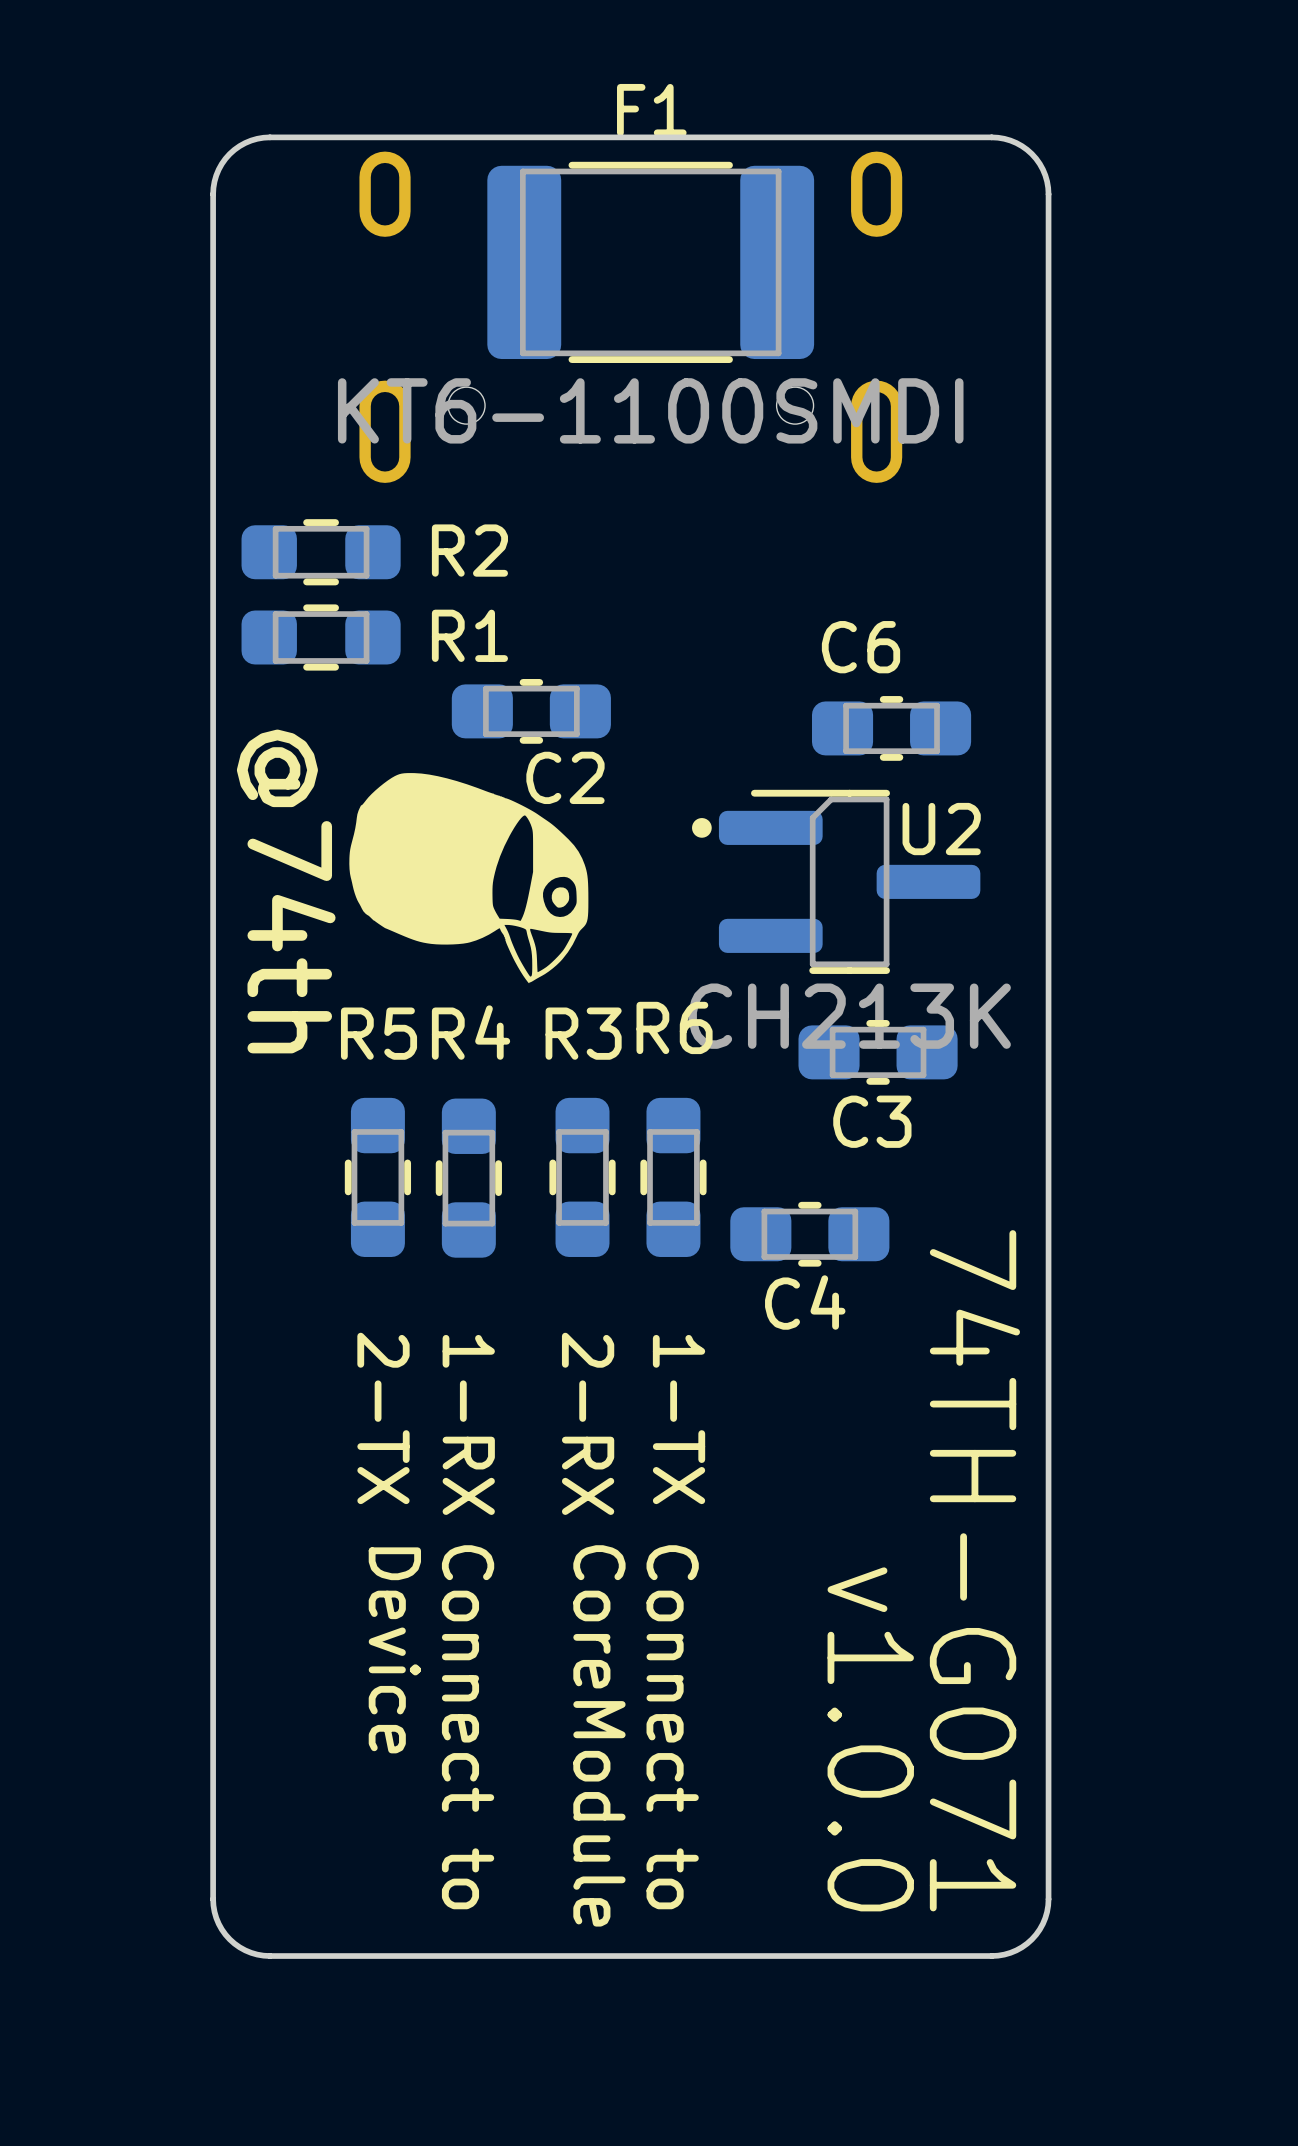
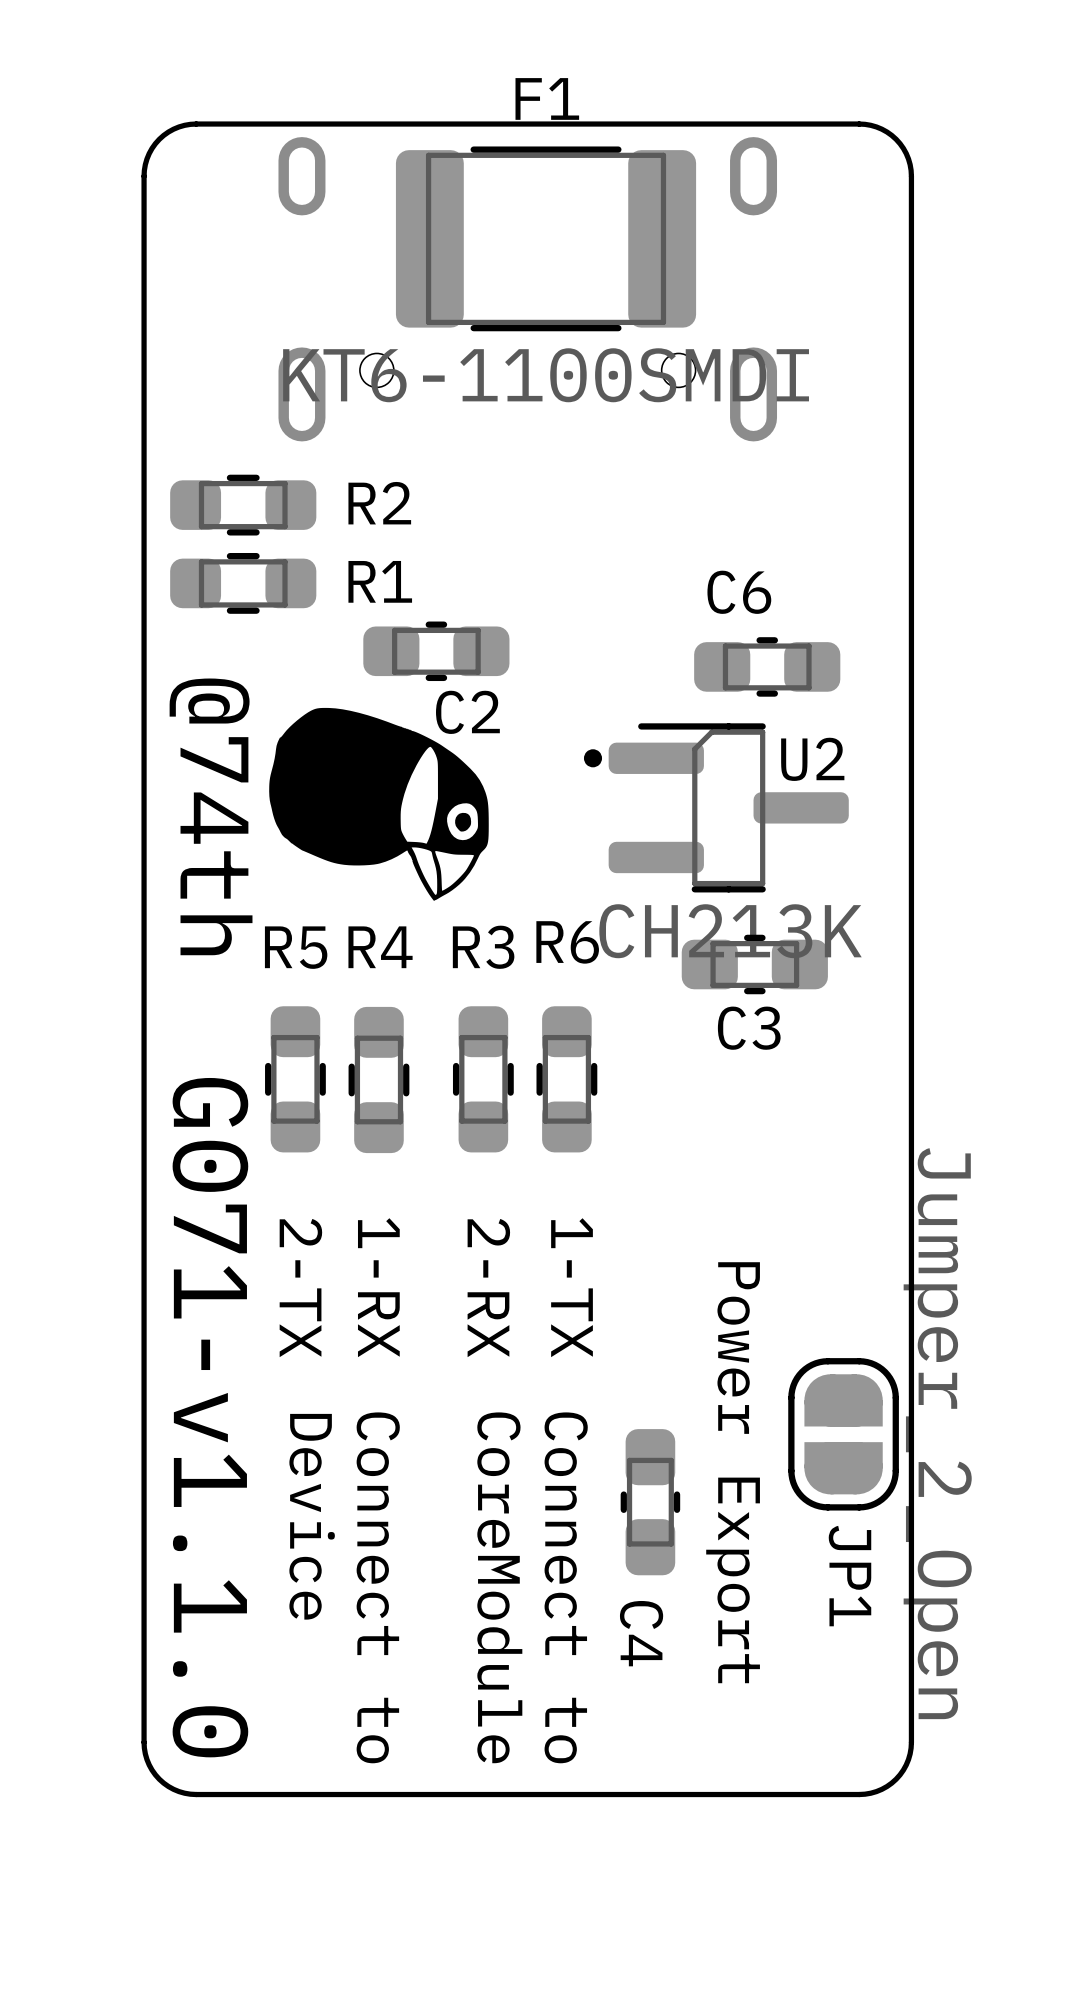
C4 rotation: 0° (809, 1234) -> 90° clockwise (650, 1502)
C4 position: (809, 1234) -> (650, 1502)
text: none -> G071-v1.1.0 (210, 1417)
JP1: none -> Jumper_2_Open (843, 1434)
text: 74TH-G071 (974, 1570) -> none
text: none -> Power Export (733, 1472)
text: v1.0.0 (870, 1739) -> none

